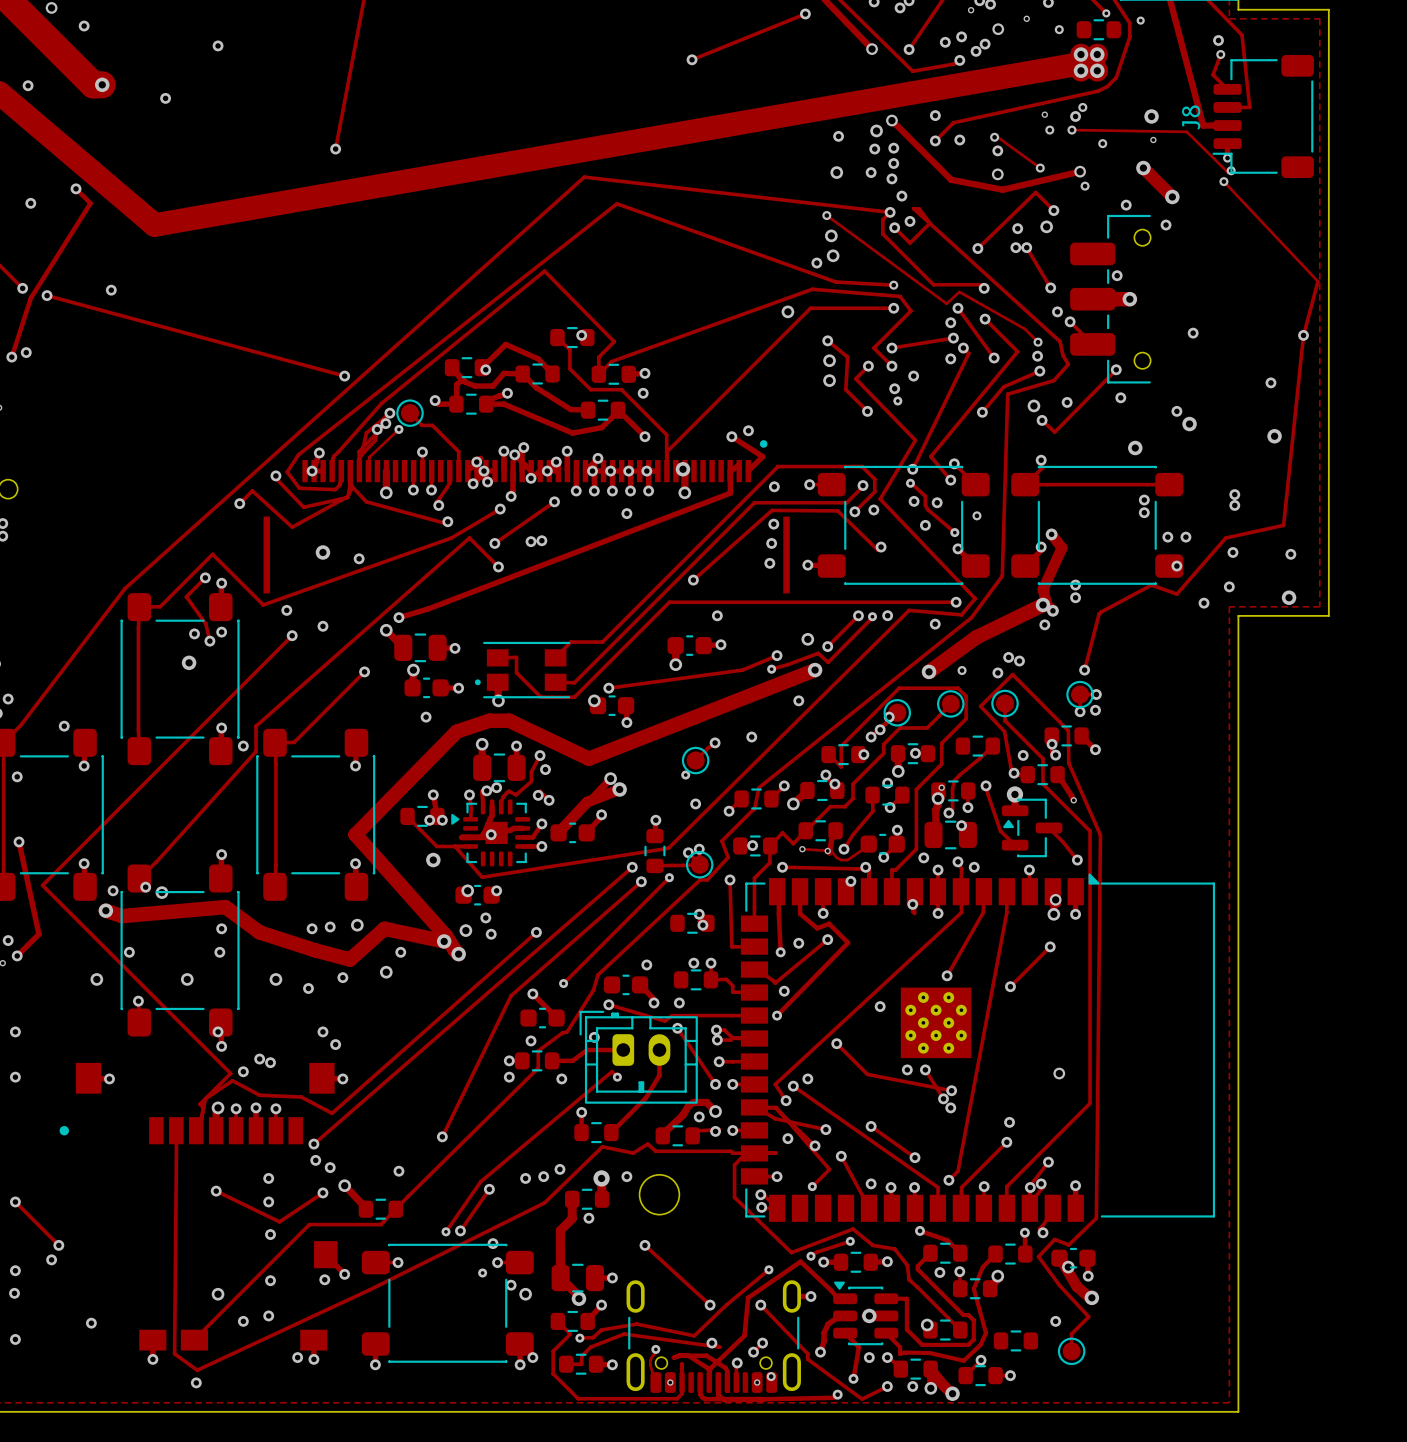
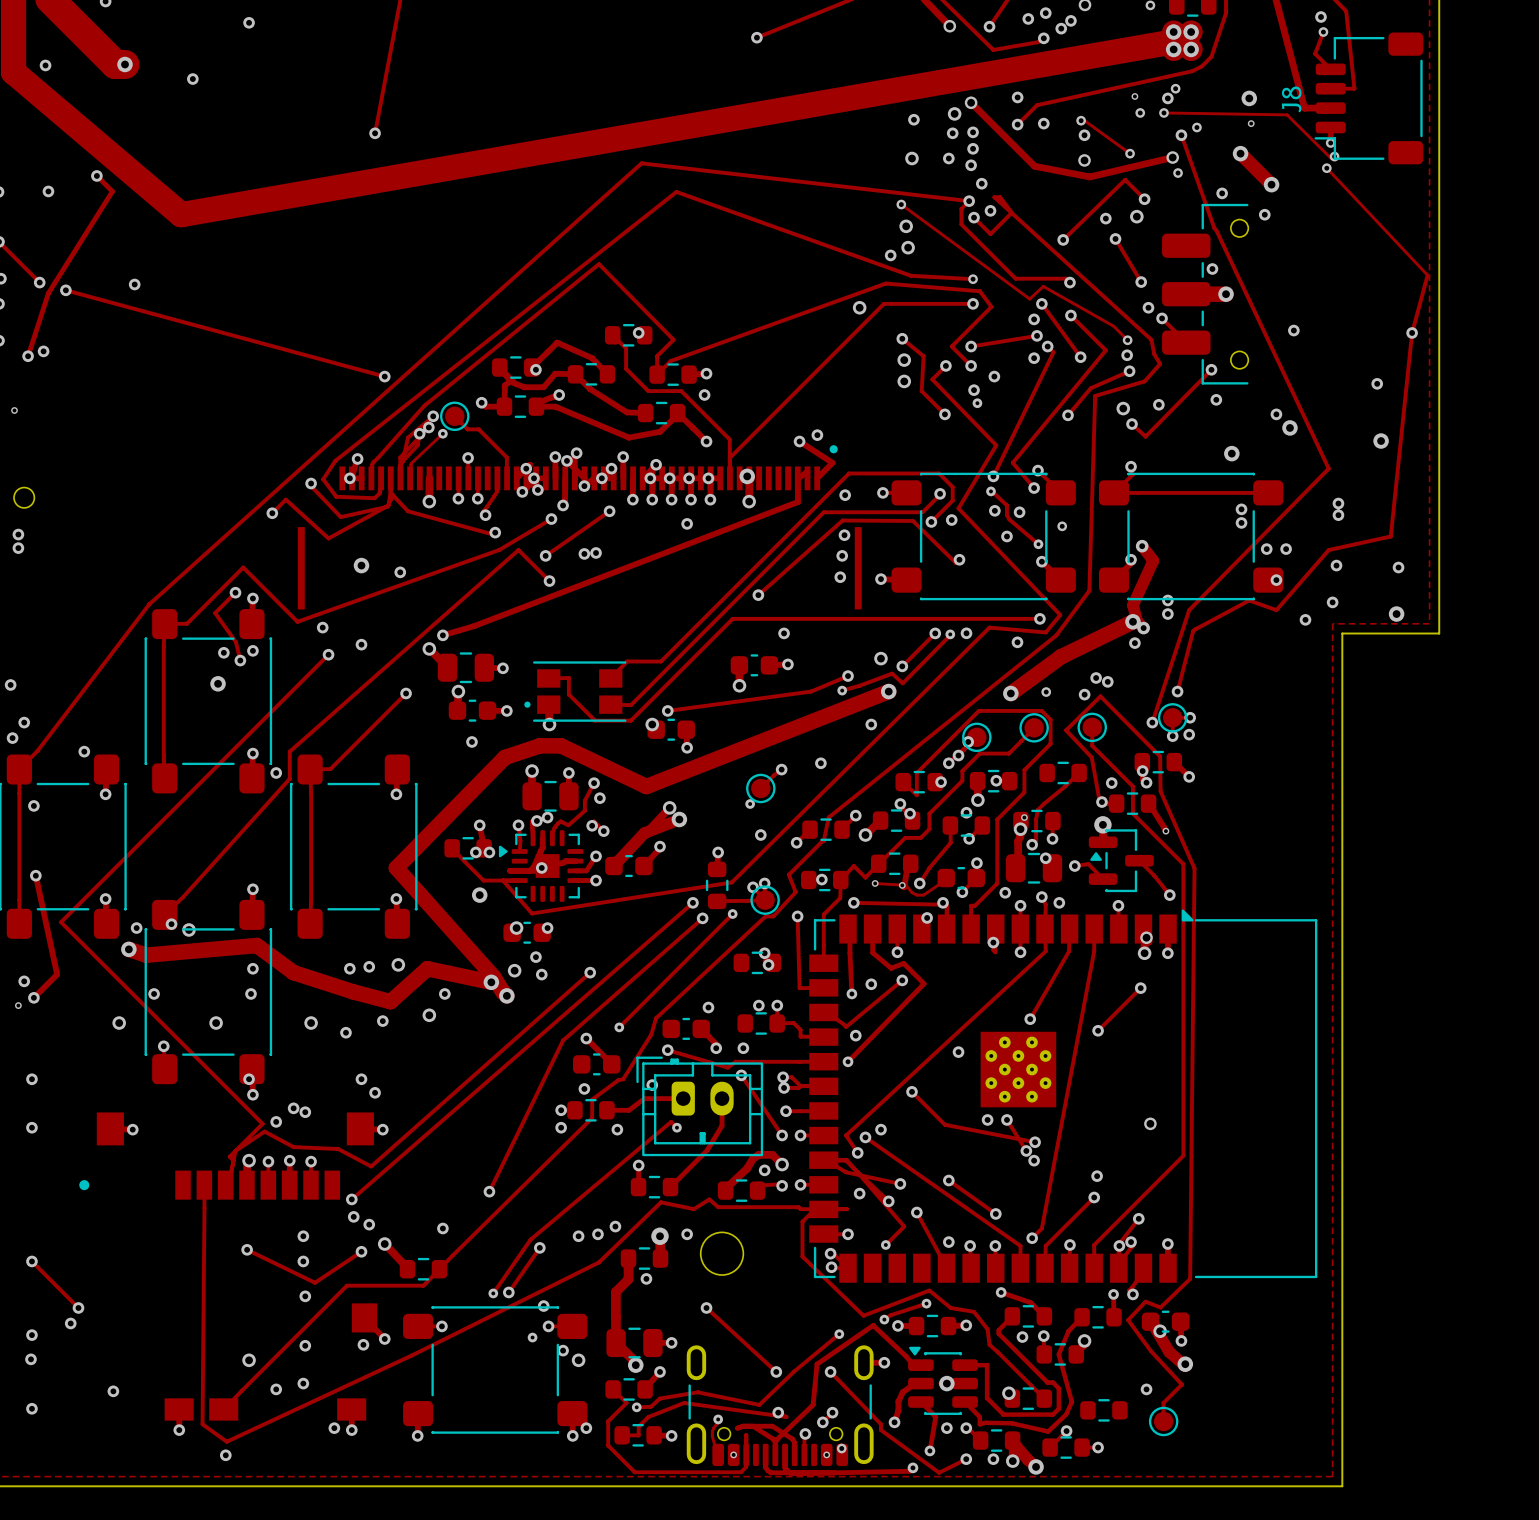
track: none -> (1181, 135) (1214, 228) (1328, 468) (1189, 610) (1152, 722)
via: none -> (1181, 135)
via: (1015, 247) -> none
via: none -> (1152, 722)
track: (986, 785) (1000, 831) (1015, 845) -> (1074, 866) (1088, 864) (1103, 879)
via position: (986, 785) -> (1074, 866)

